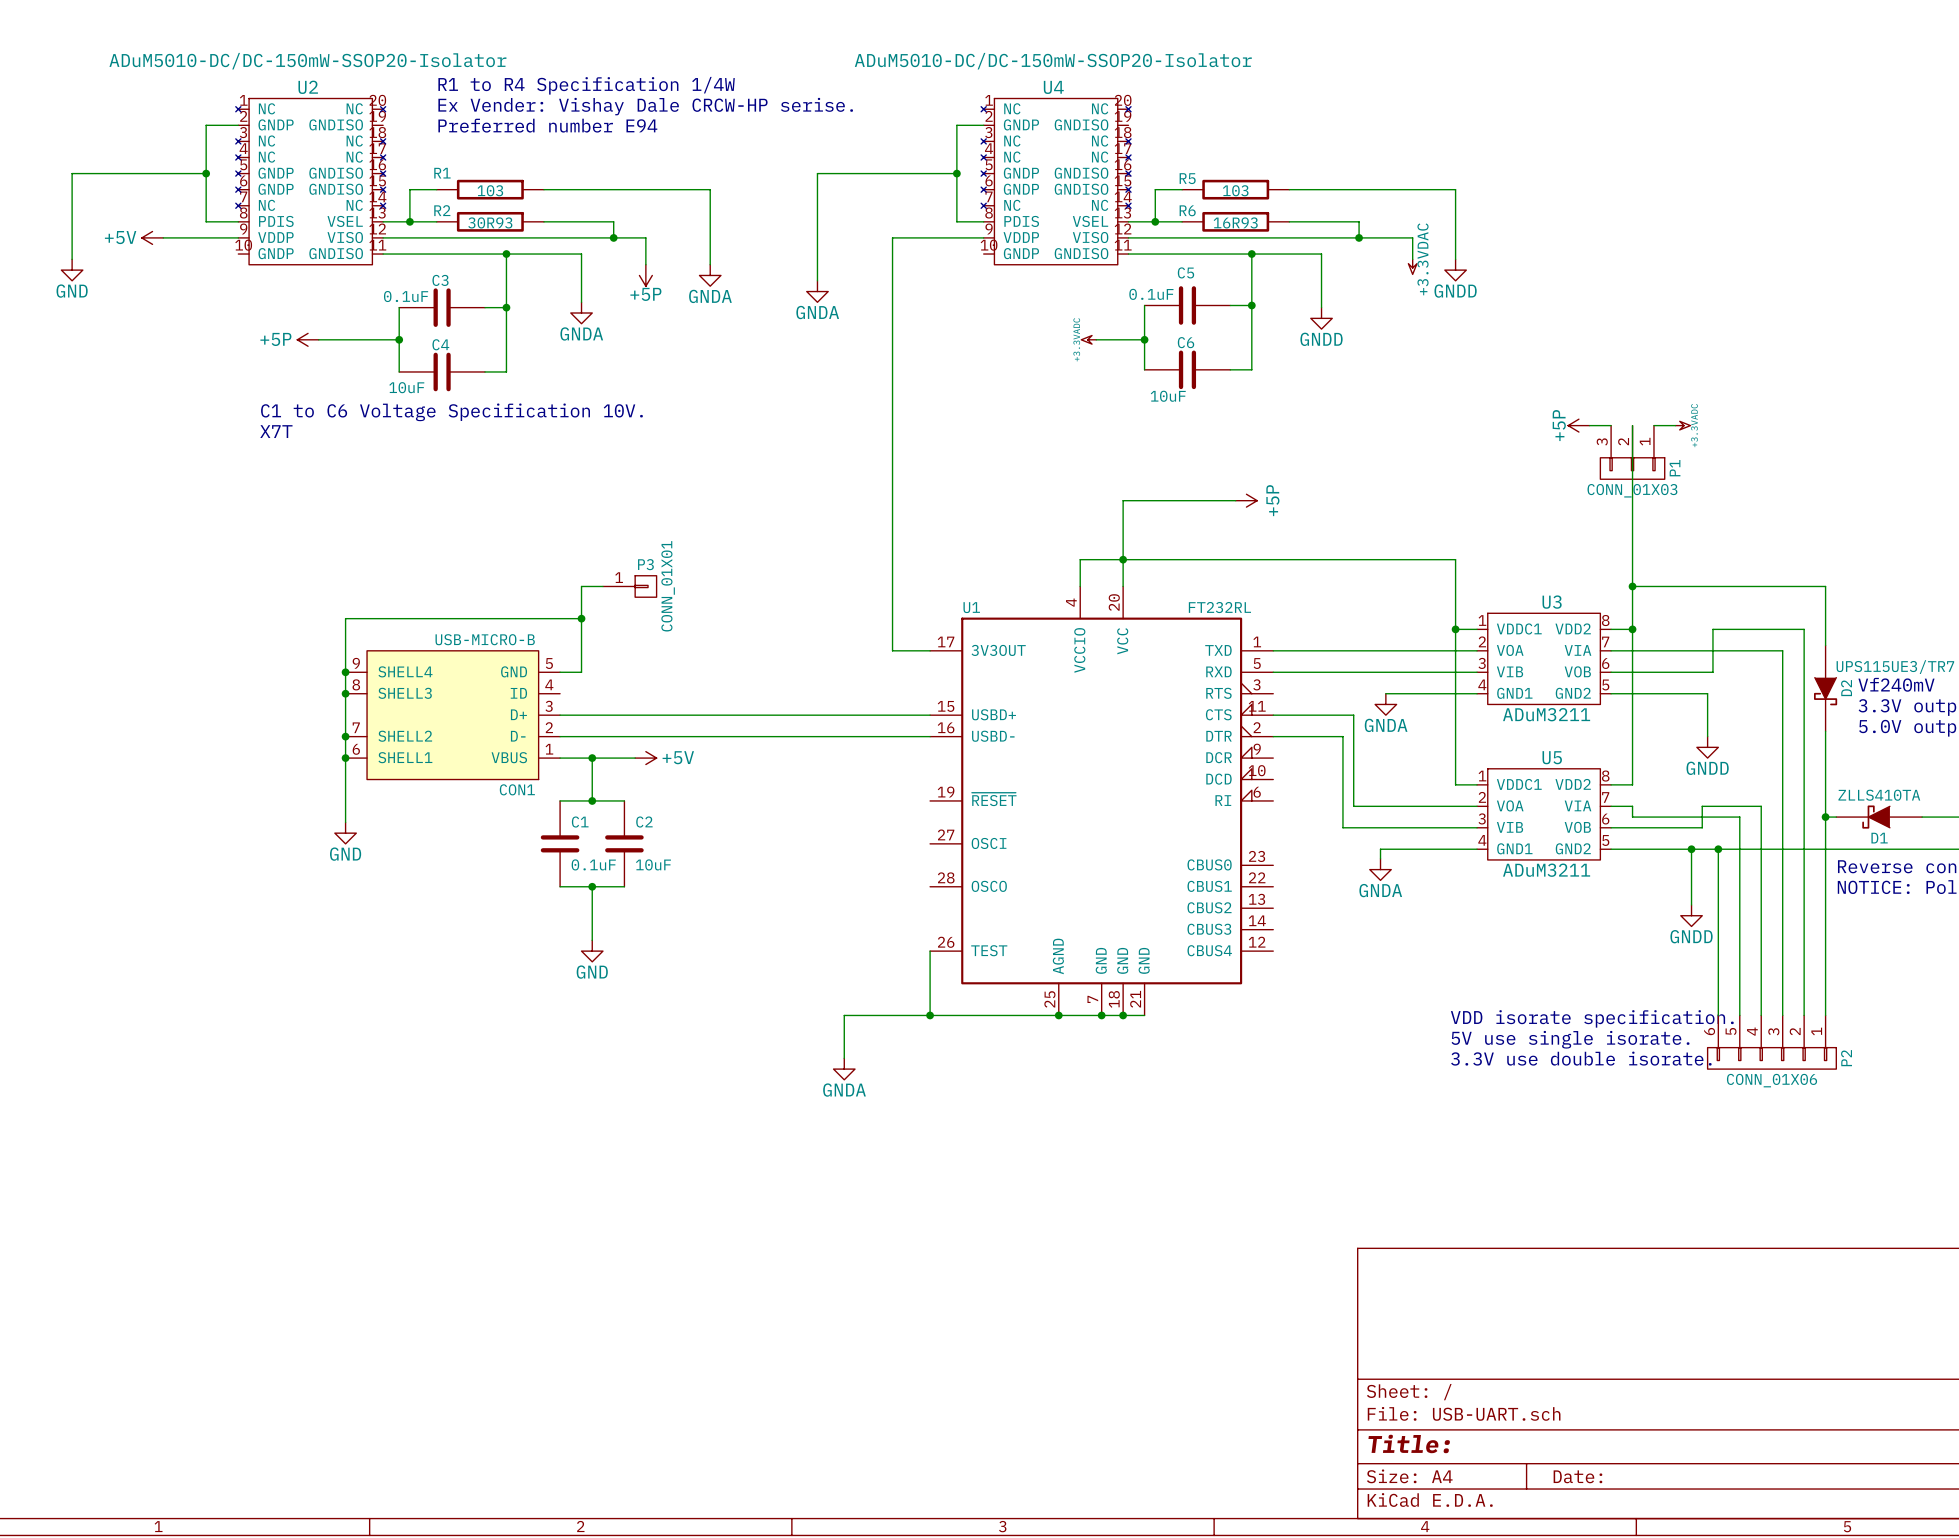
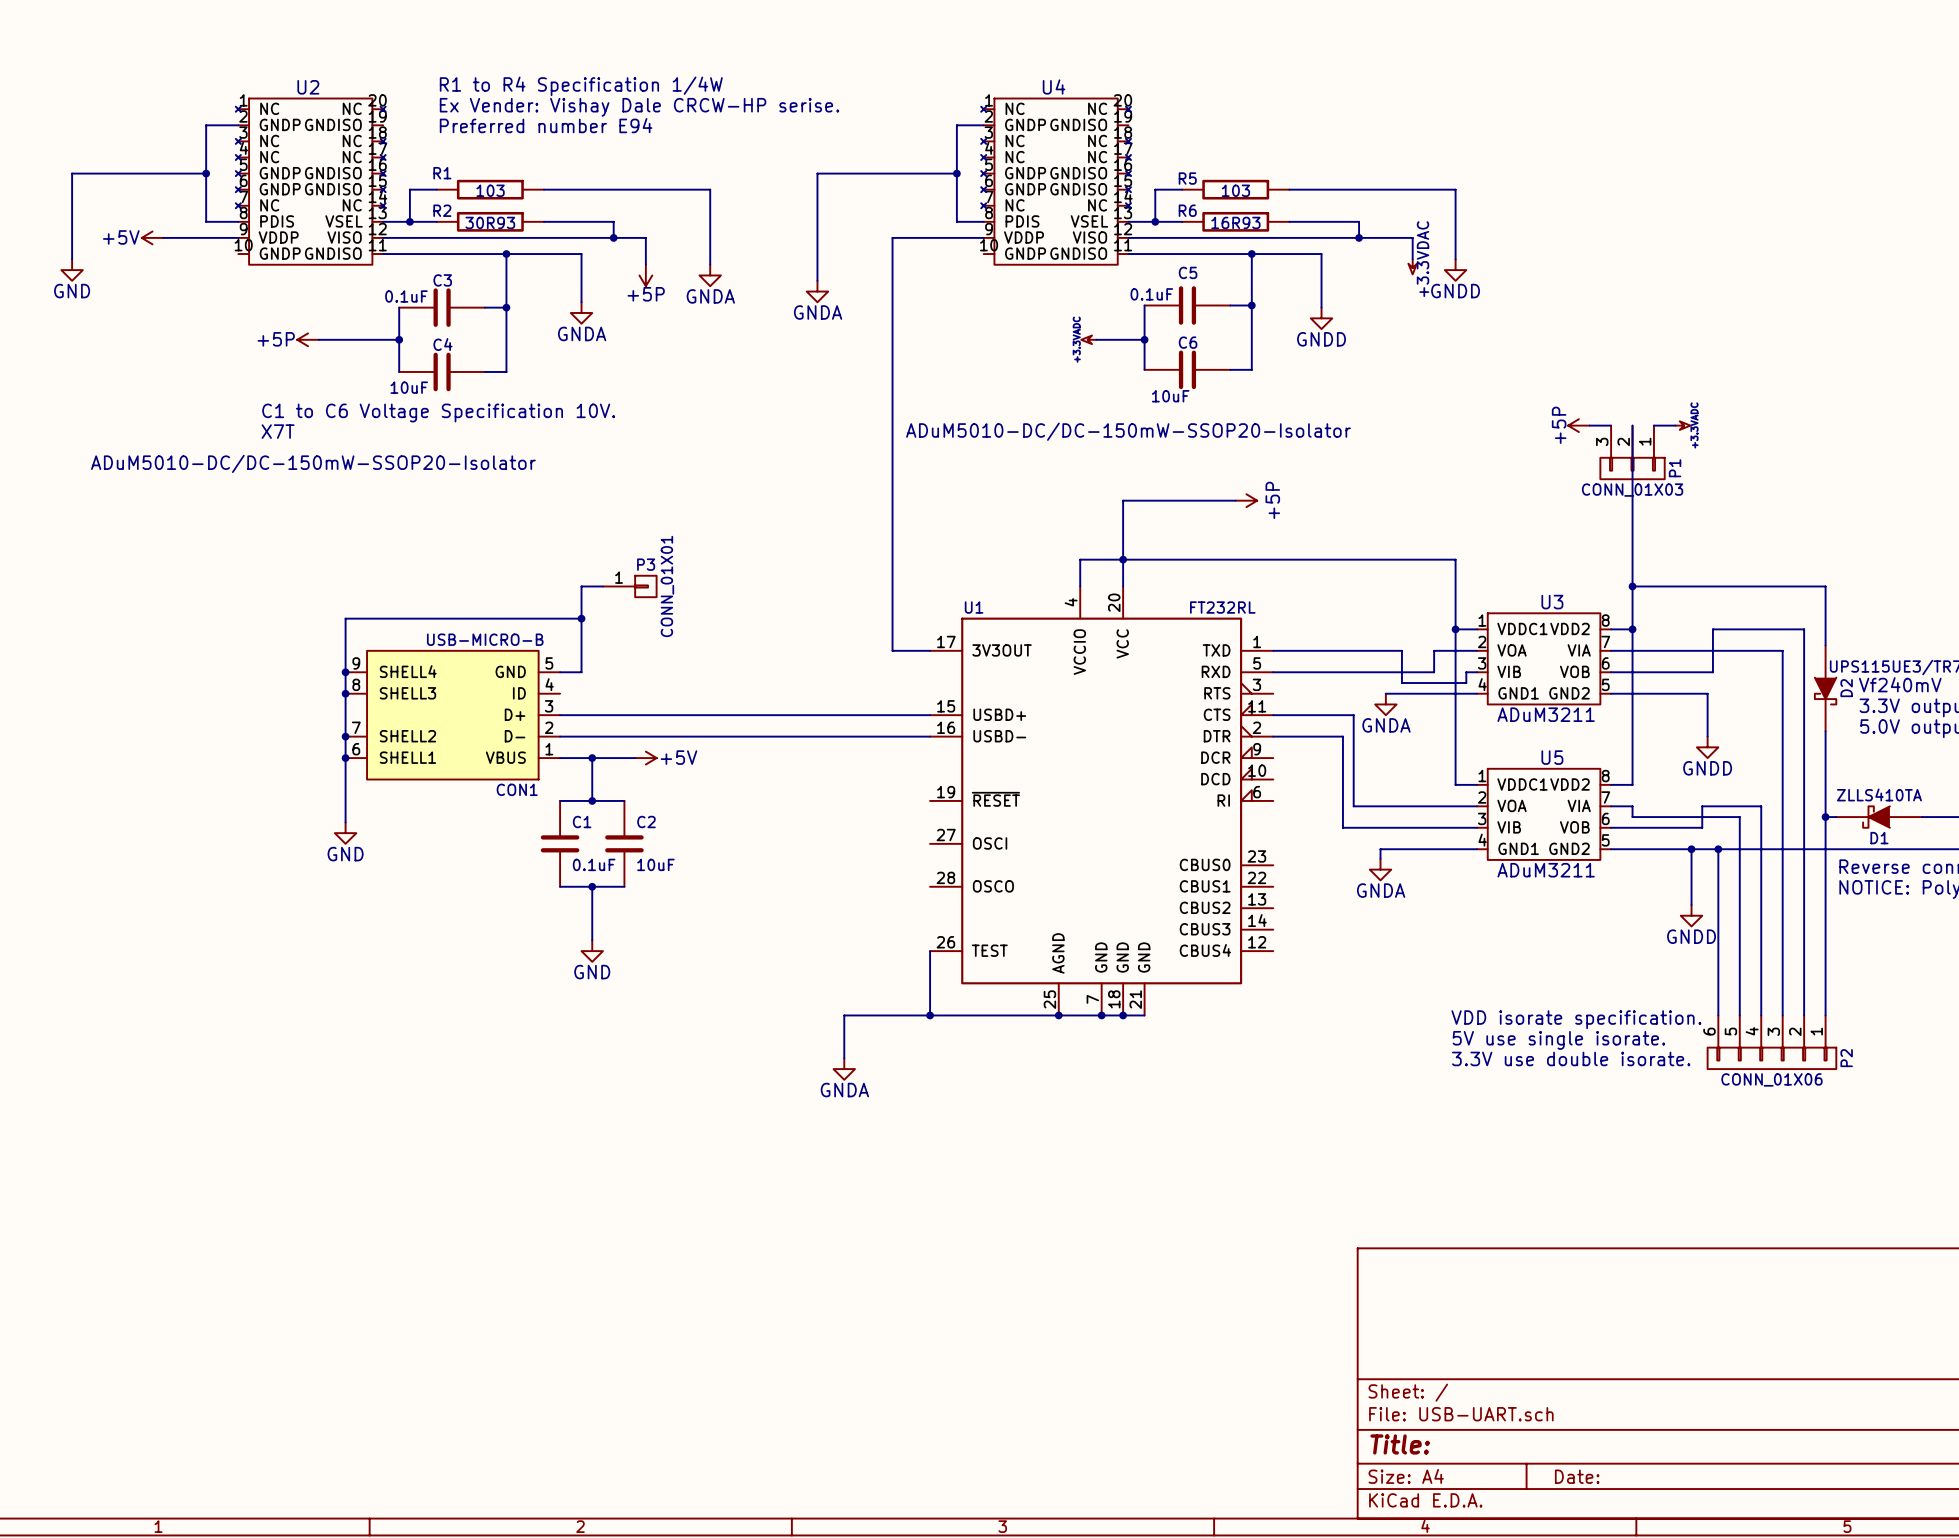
U2 value position: ADuM5010-DC/DC-150mW-SSOP20-Isolator (307, 61) -> ADuM5010-DC/DC-150mW-SSOP20-Isolator (313, 463)
U4 value position: ADuM5010-DC/DC-150mW-SSOP20-Isolator (1053, 61) -> ADuM5010-DC/DC-150mW-SSOP20-Isolator (1128, 431)
wire: (1401, 650) (1434, 650) -> (1401, 650) (1401, 683) (1466, 683) (1466, 672)
wire: (1434, 672) (1466, 672) -> (1434, 672) (1434, 650)

